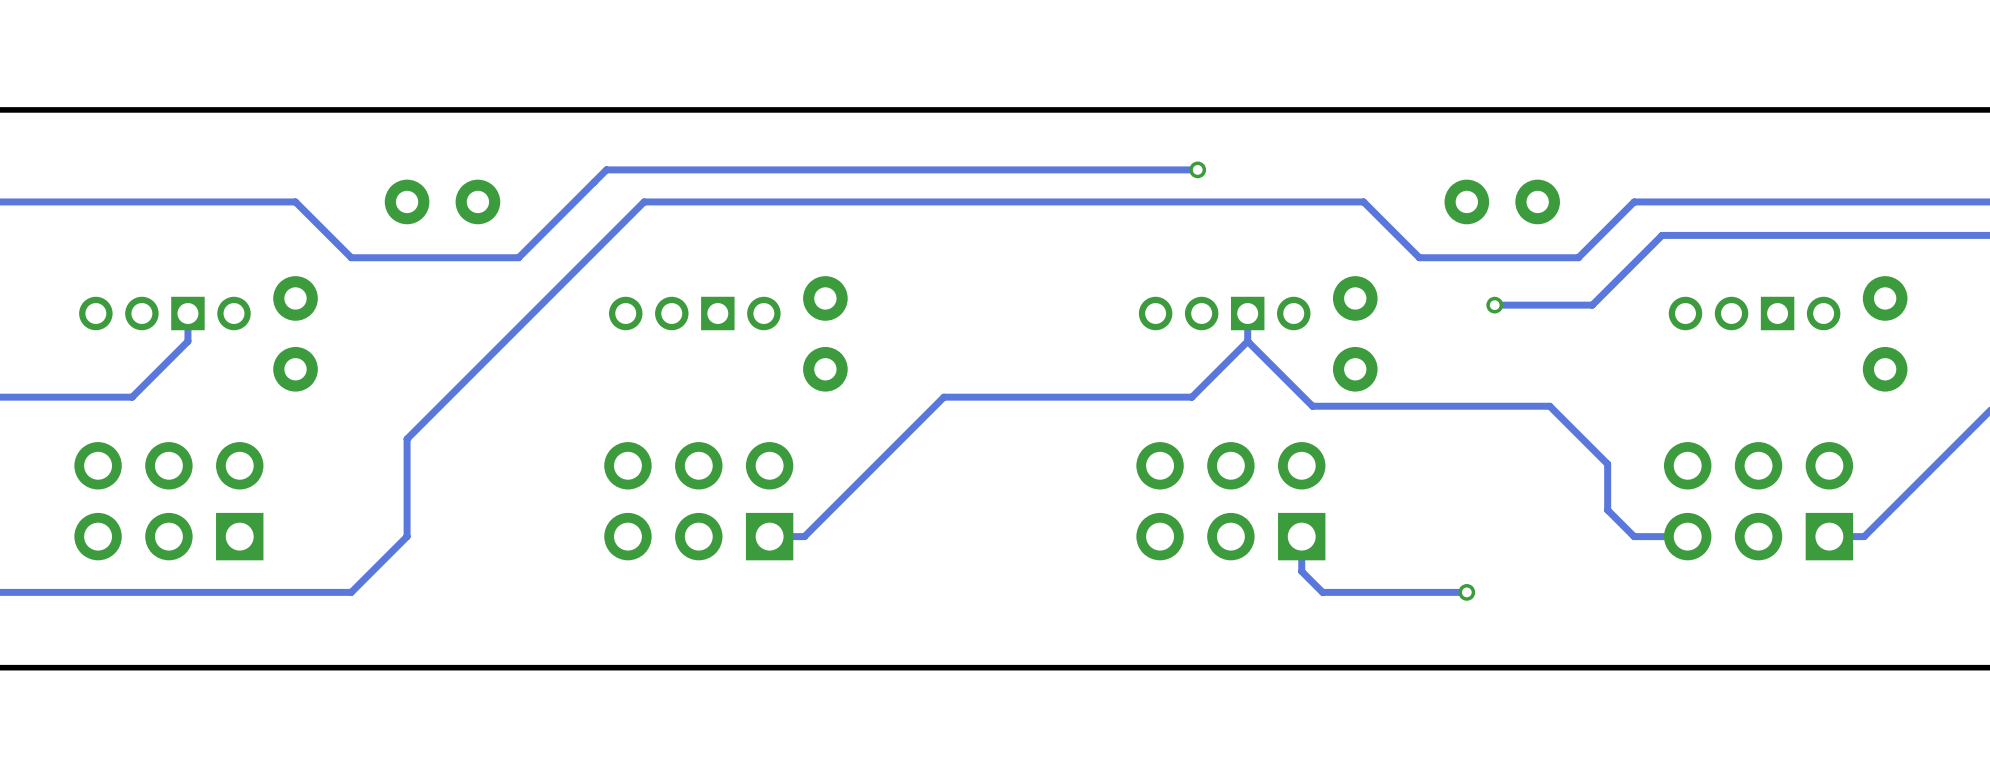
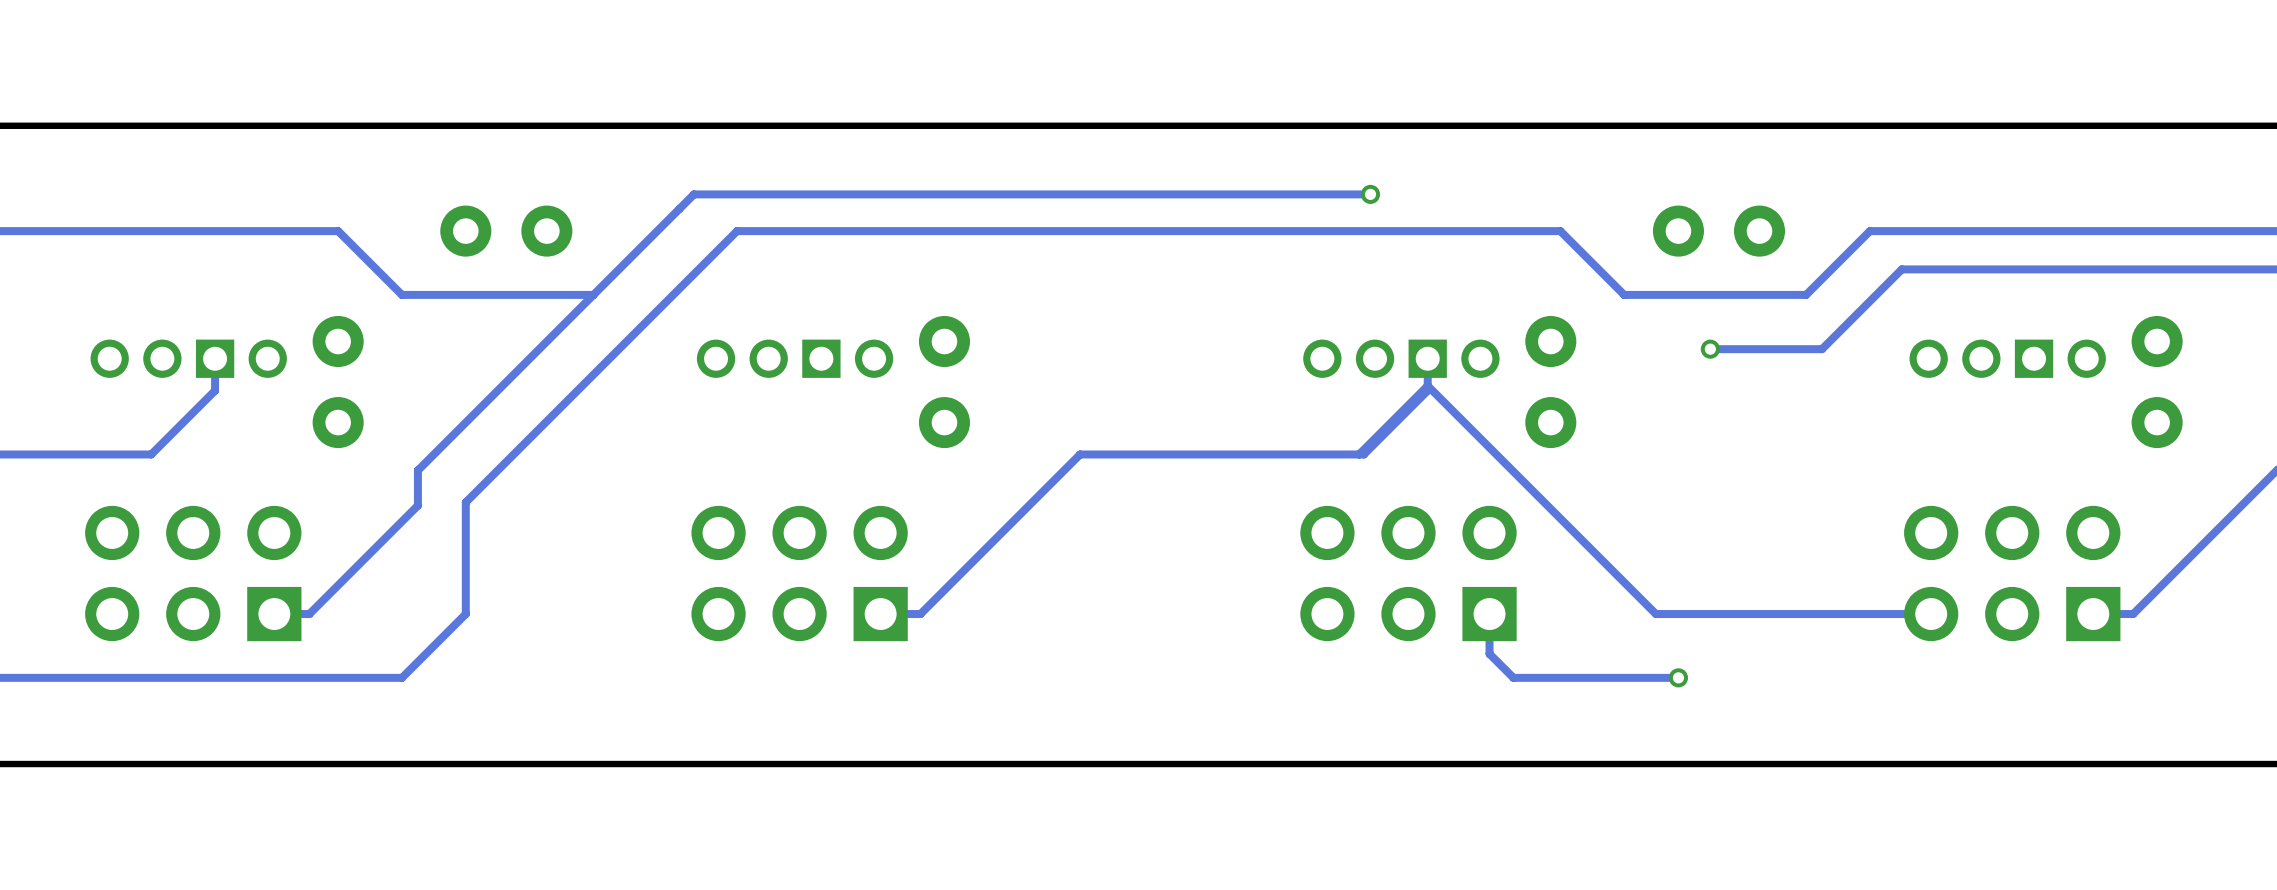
track: none -> (593, 294) (417, 470) (417, 505) (309, 614) (274, 614)
track: (1247, 341) (1312, 406) (1549, 406) (1607, 464) (1607, 510) (1634, 536) -> (1359, 454) (1427, 385) (1655, 614) (1869, 614)

